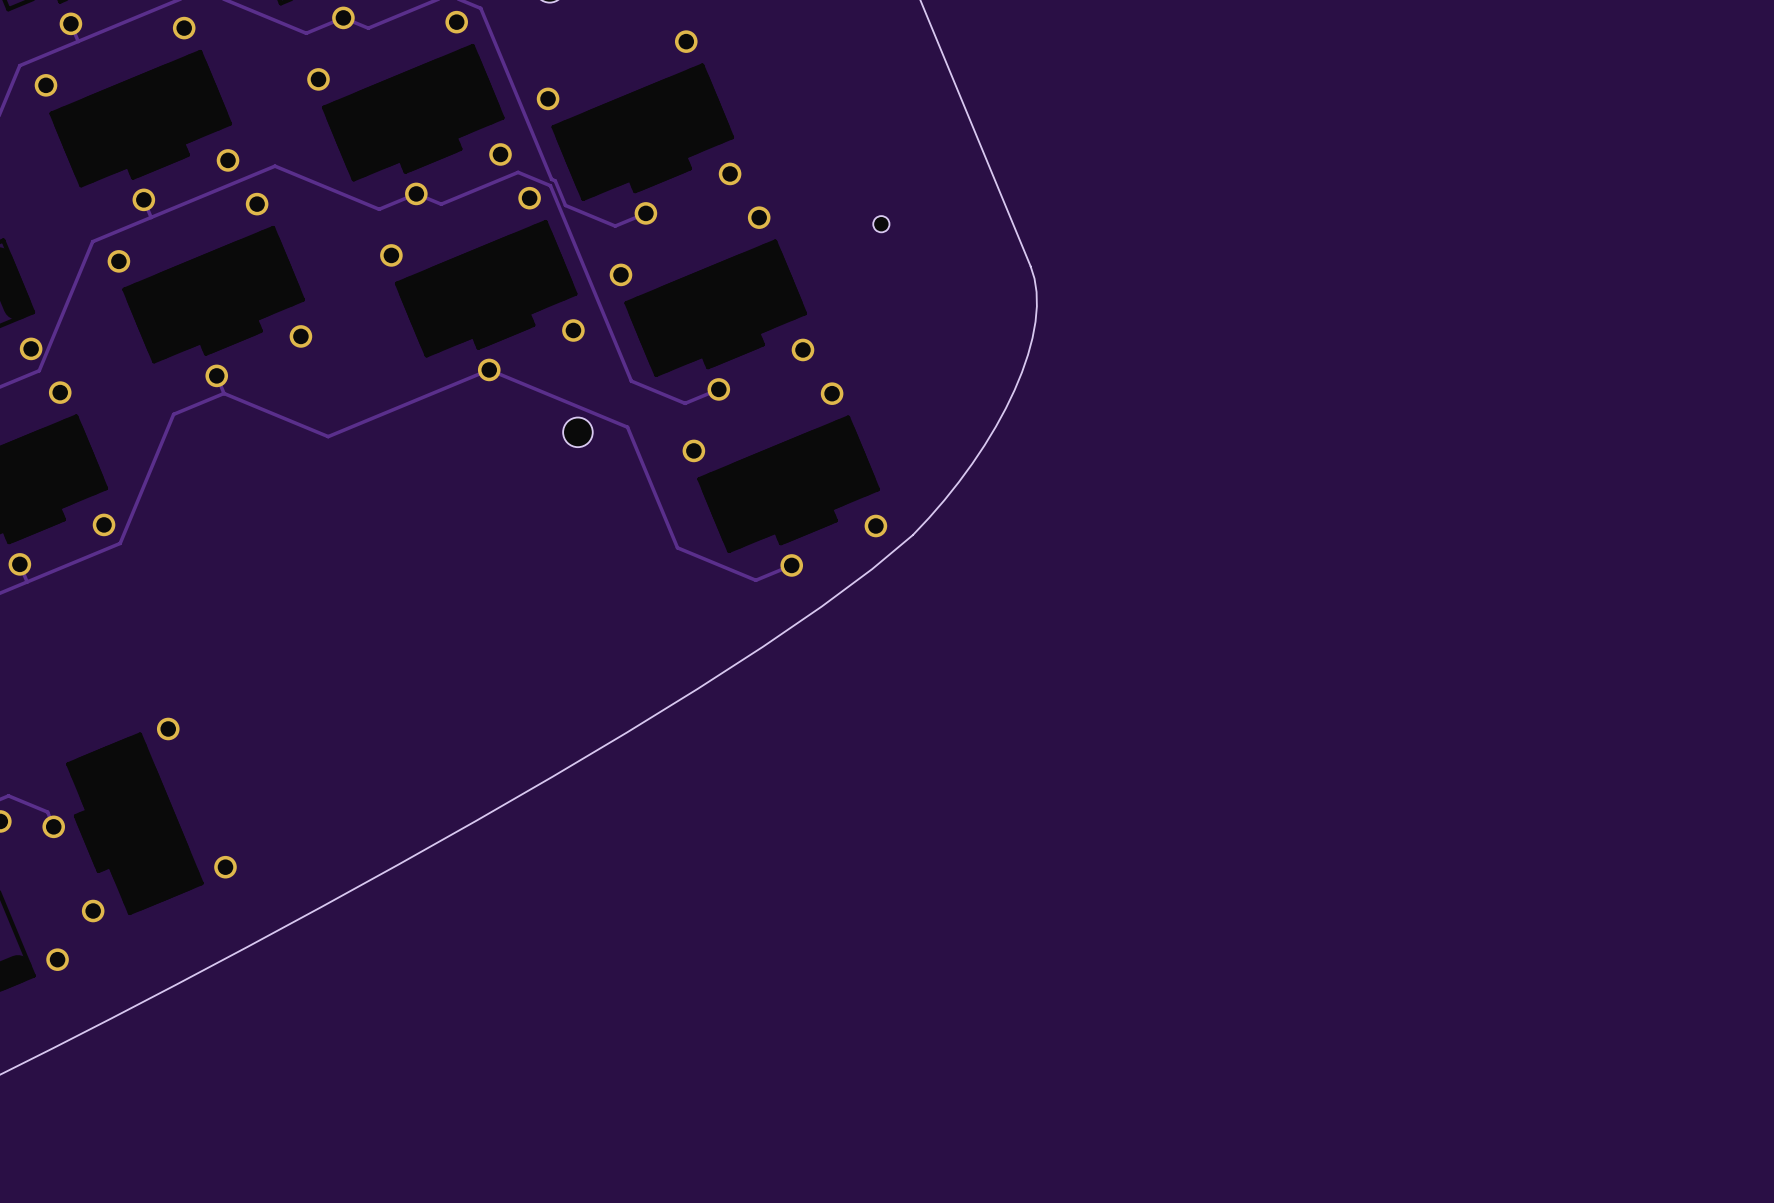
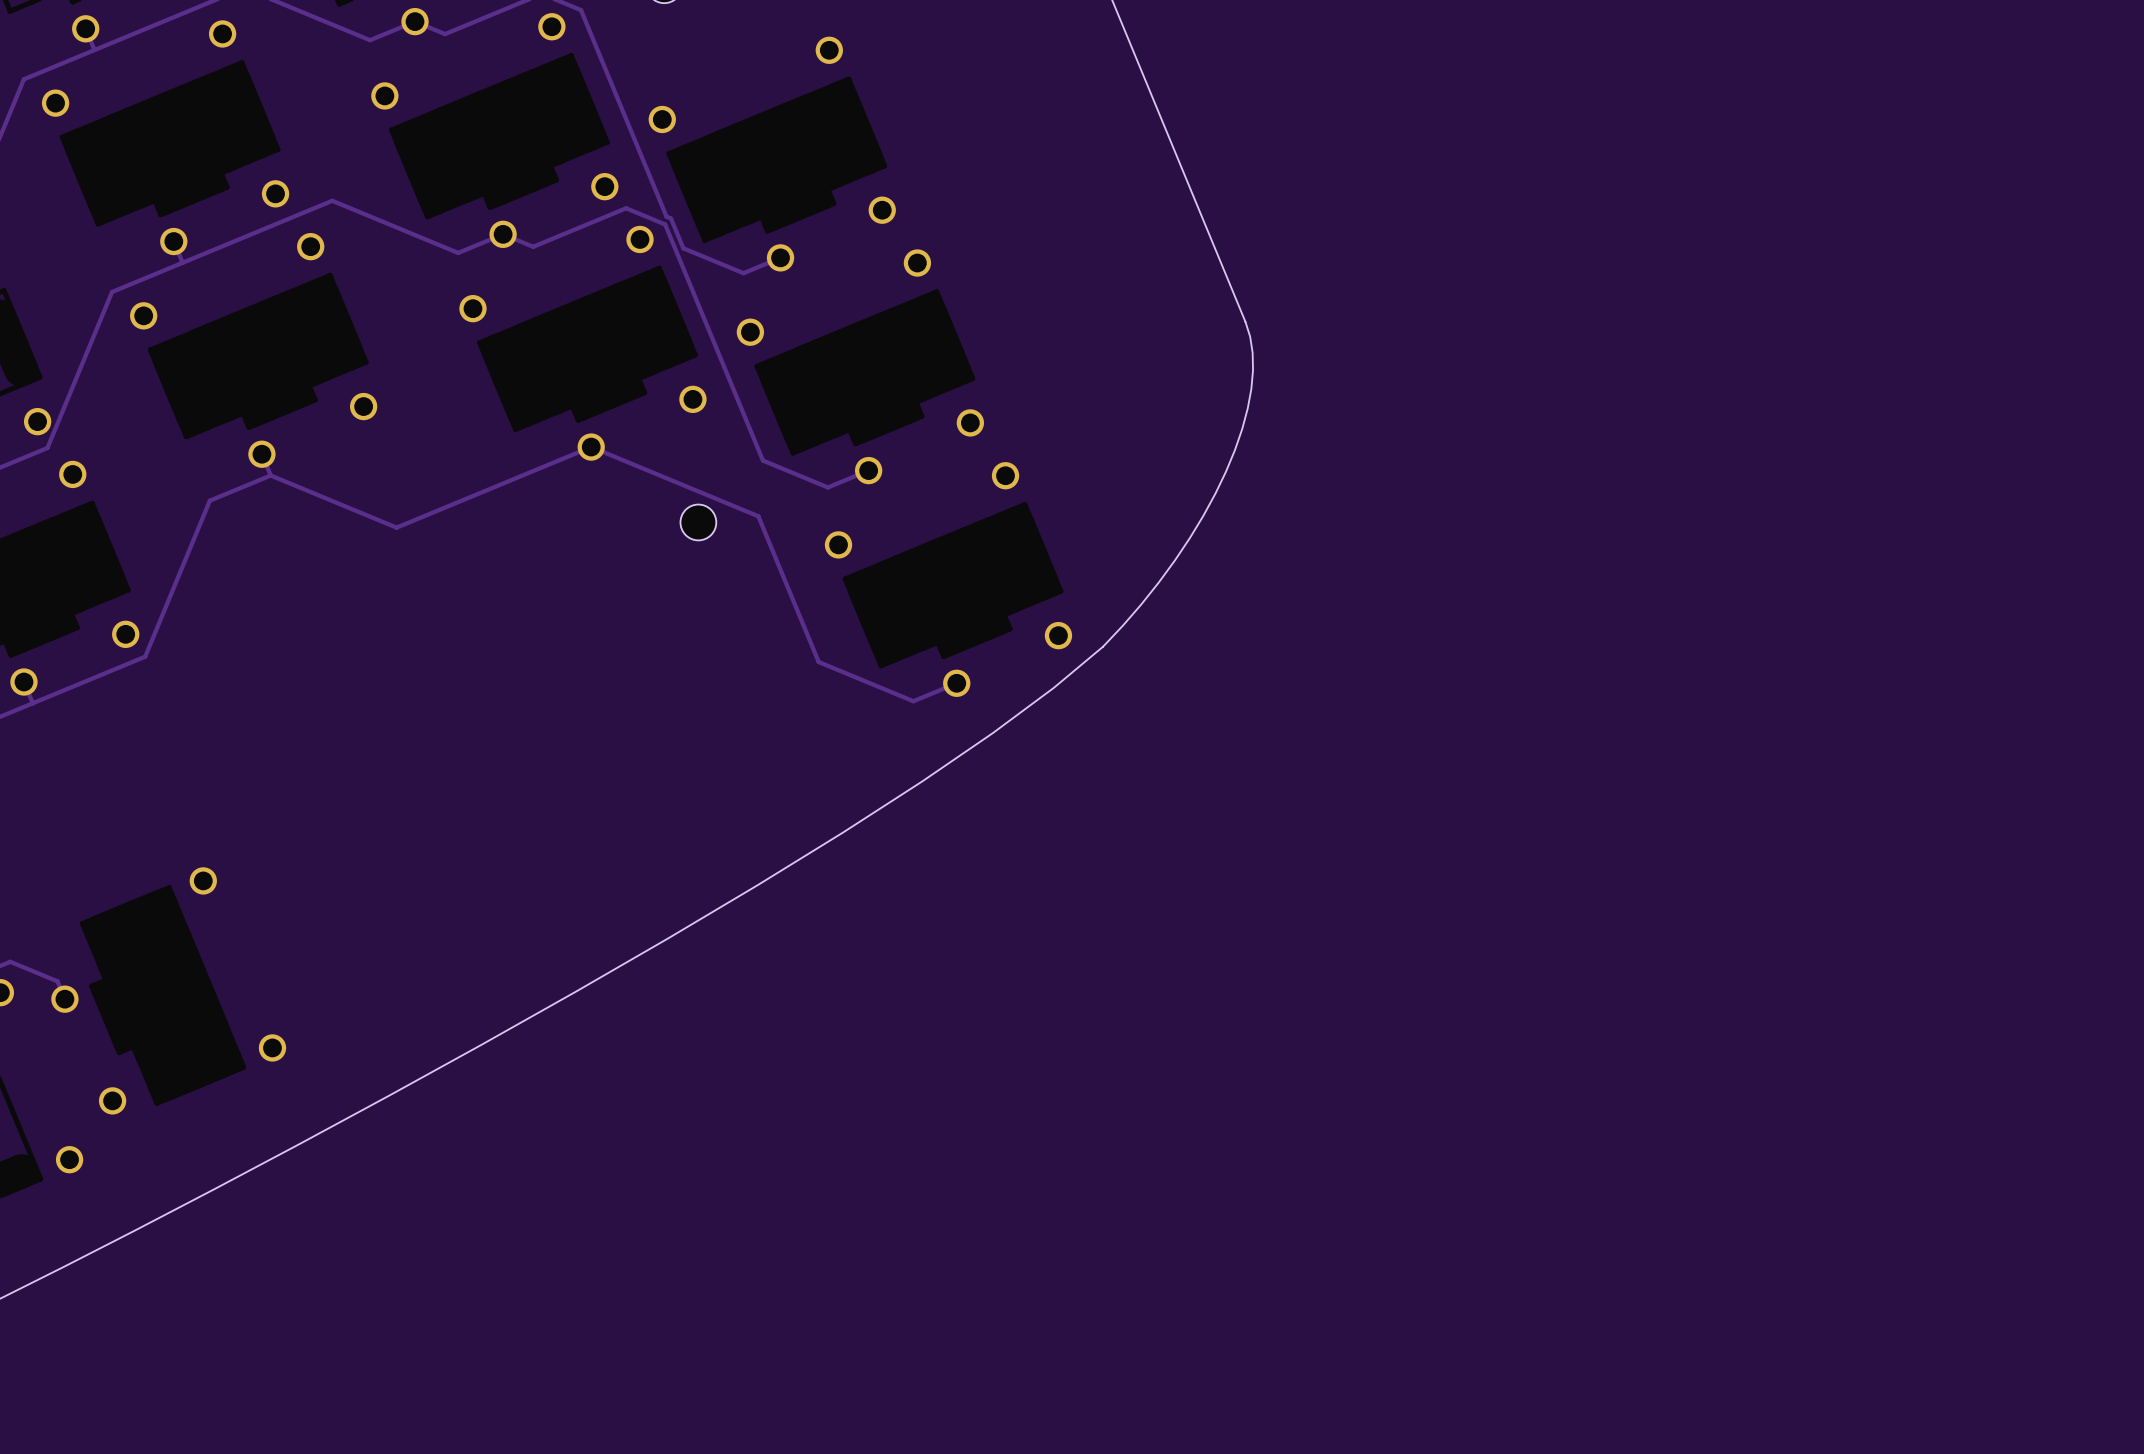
part: (881, 224) -> none

